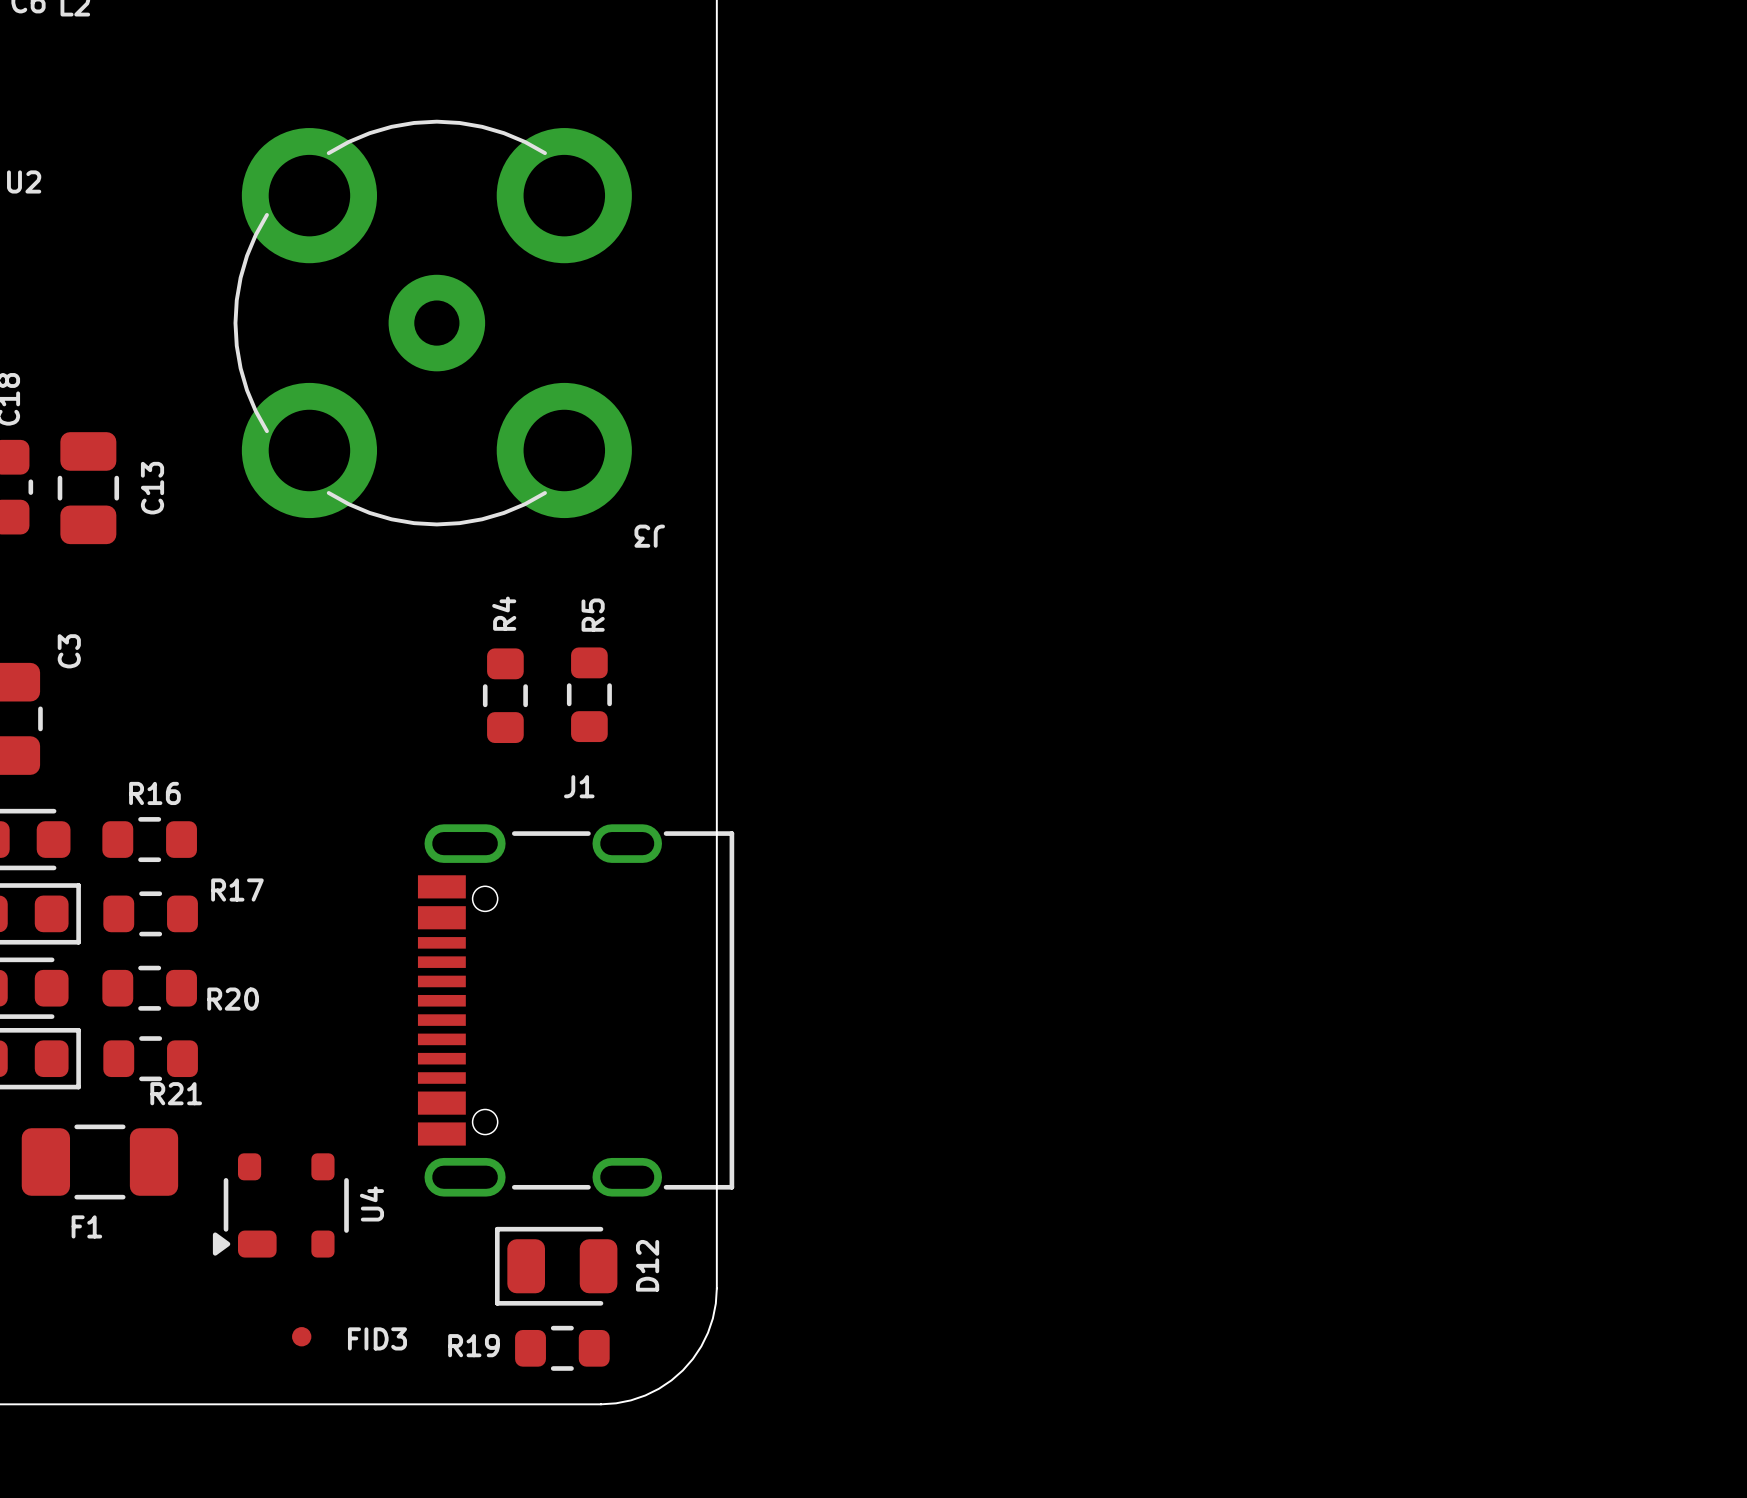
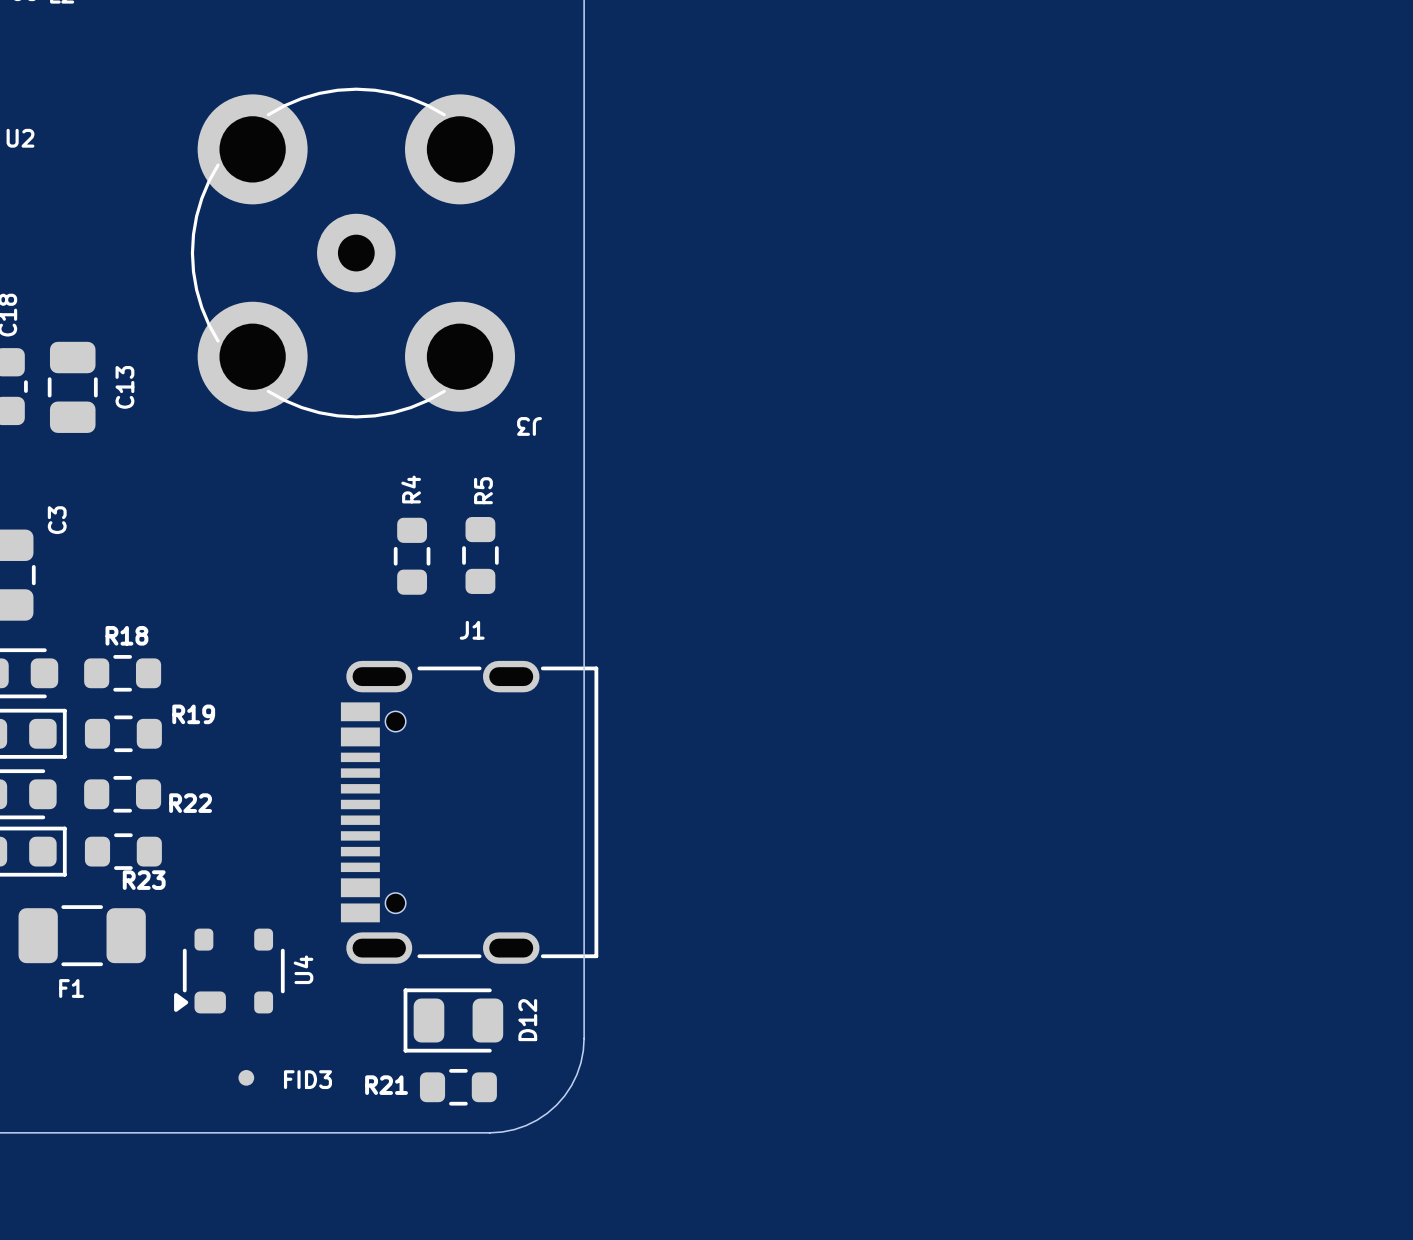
R16 name: R16 (154, 793) -> R18 (126, 635)
R17 name: R17 (237, 889) -> R19 (193, 714)
R20 name: R20 (233, 999) -> R22 (190, 803)
R21 name: R21 (176, 1093) -> R23 (144, 880)
R19 name: R19 (474, 1345) -> R21 (386, 1085)

